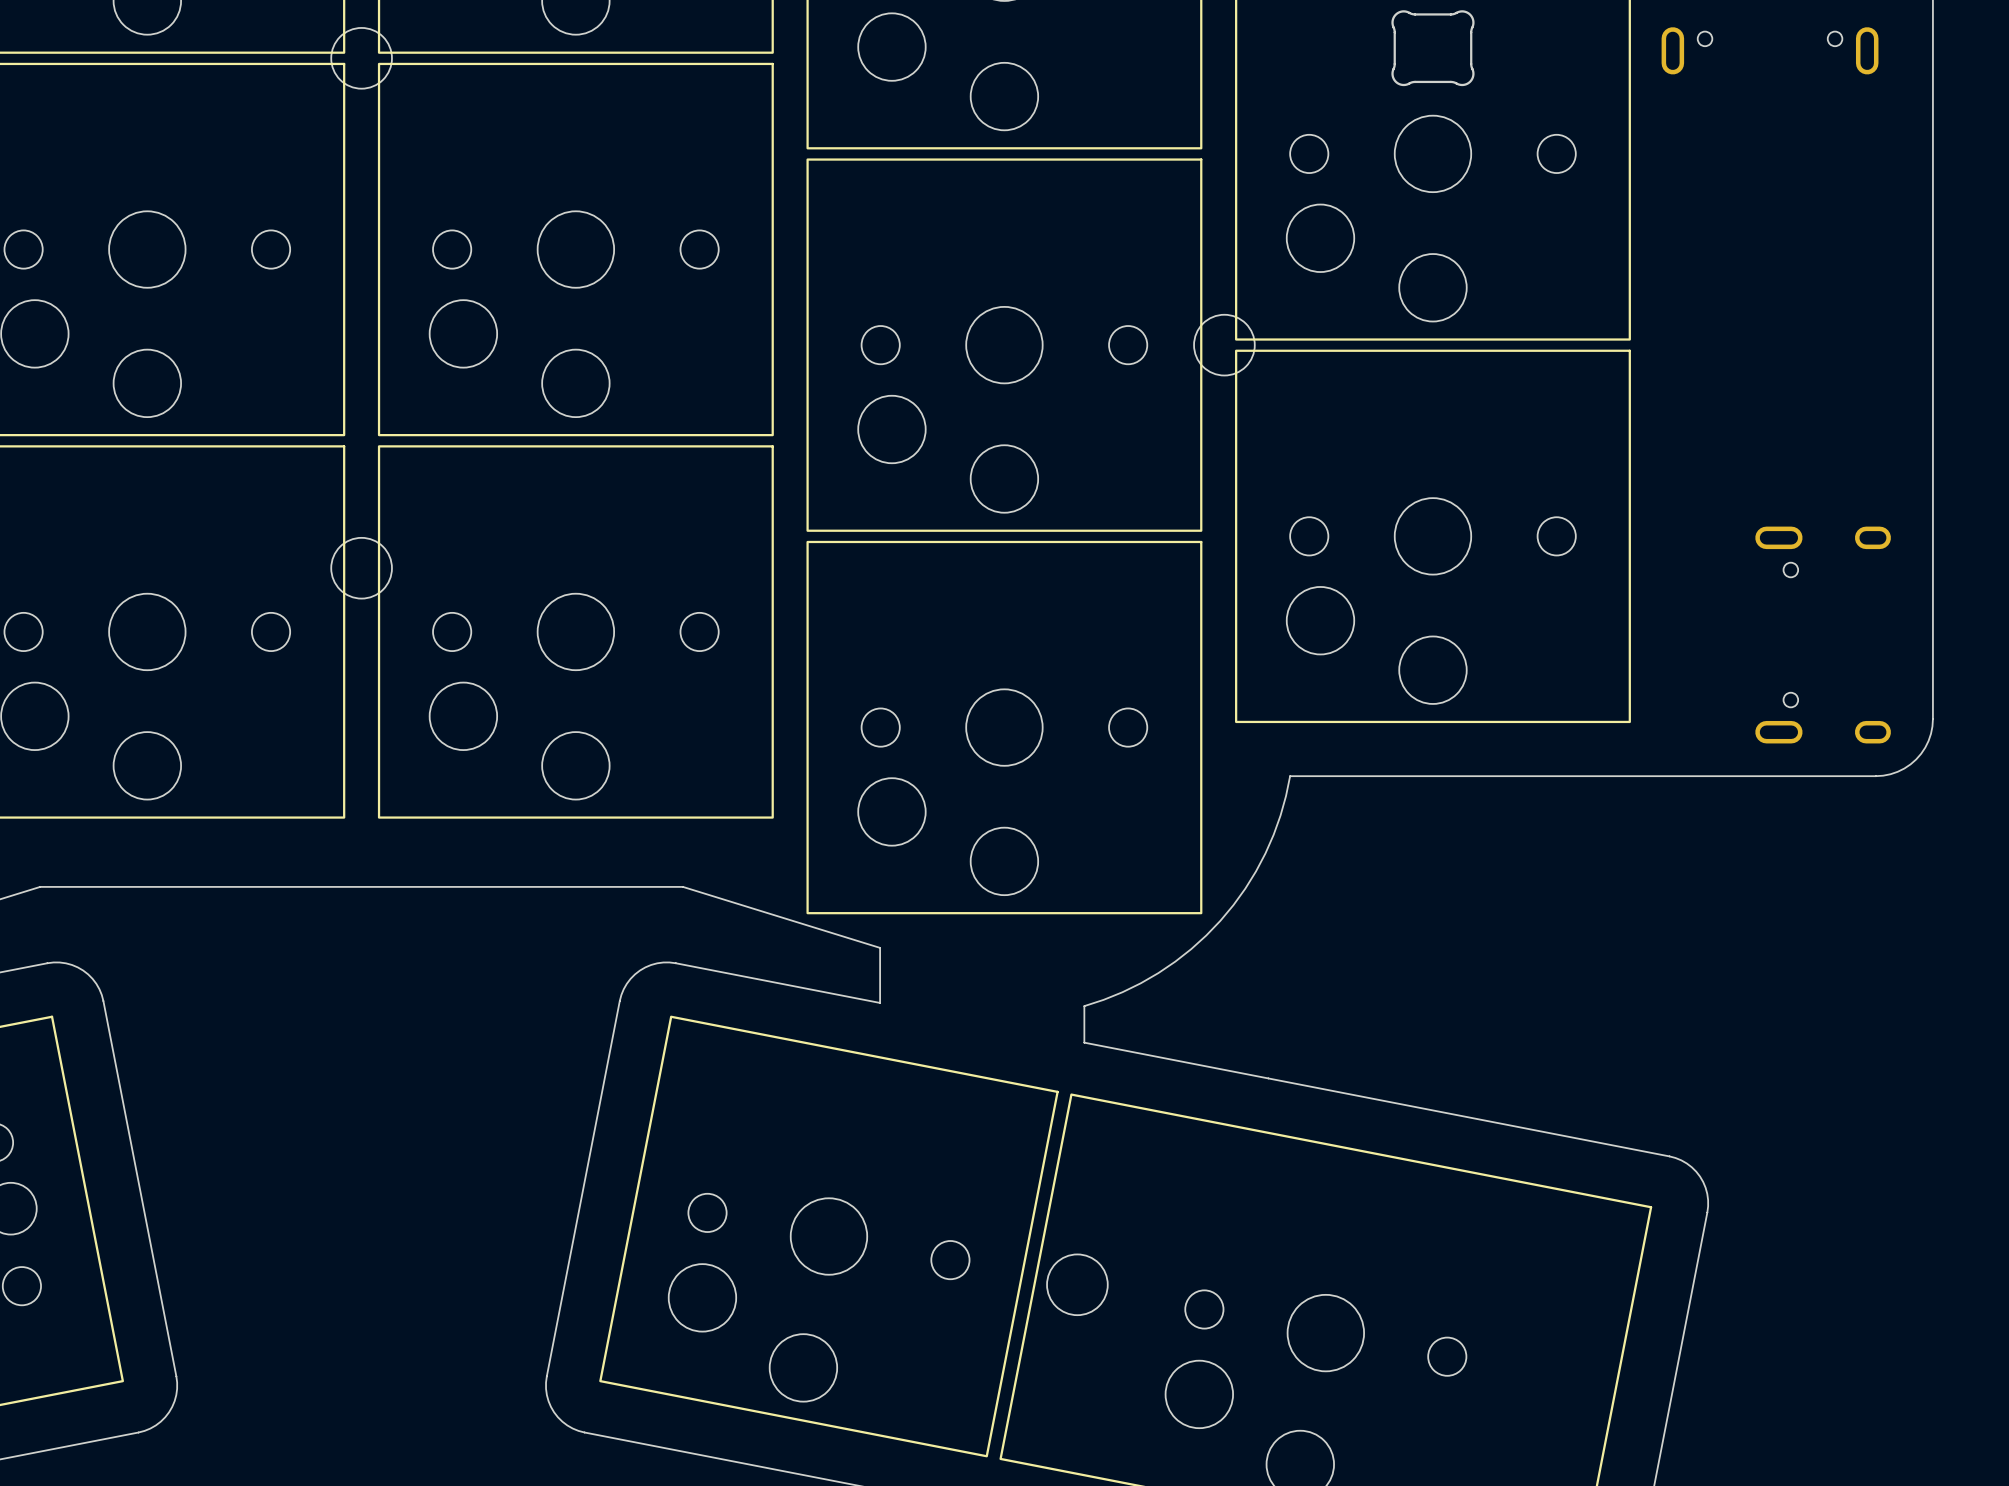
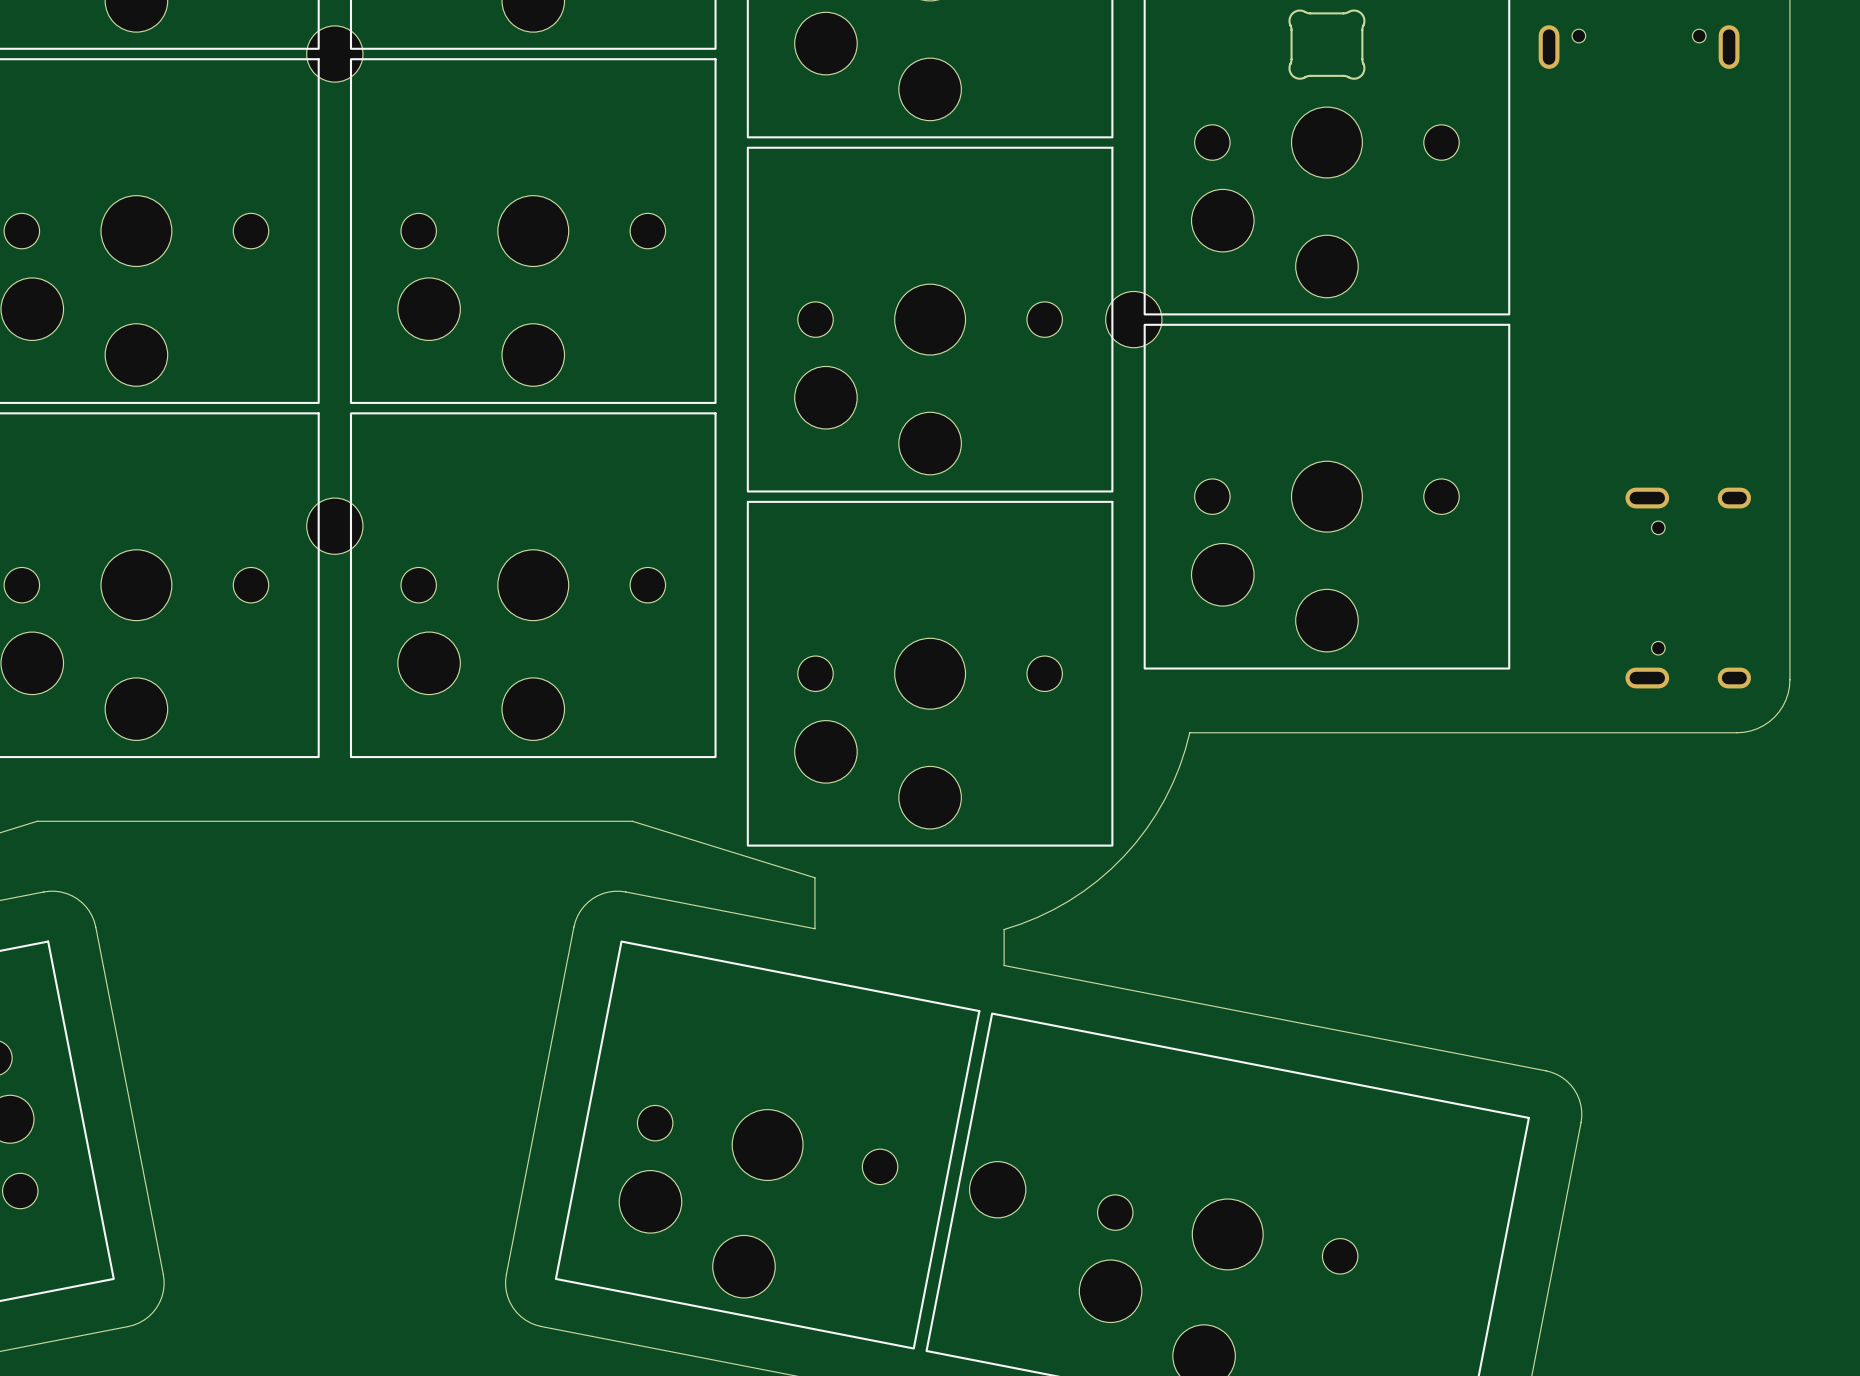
board edge: (1932, 719) (1928, 740) (1916, 759) (1897, 771) (1883, 775) (1290, 776) (1280, 815) (1265, 853) (1245, 888) (1220, 920) (1191, 949) (1158, 973) (1122, 992) (1084, 1006) -> (1789, 665) (1788, 693) (1778, 712) (1763, 725) (1743, 732) (1189, 732) (1179, 766) (1165, 799) (1146, 829) (1123, 856) (1097, 880) (1068, 901) (1037, 917) (1004, 929) (1004, 931)

